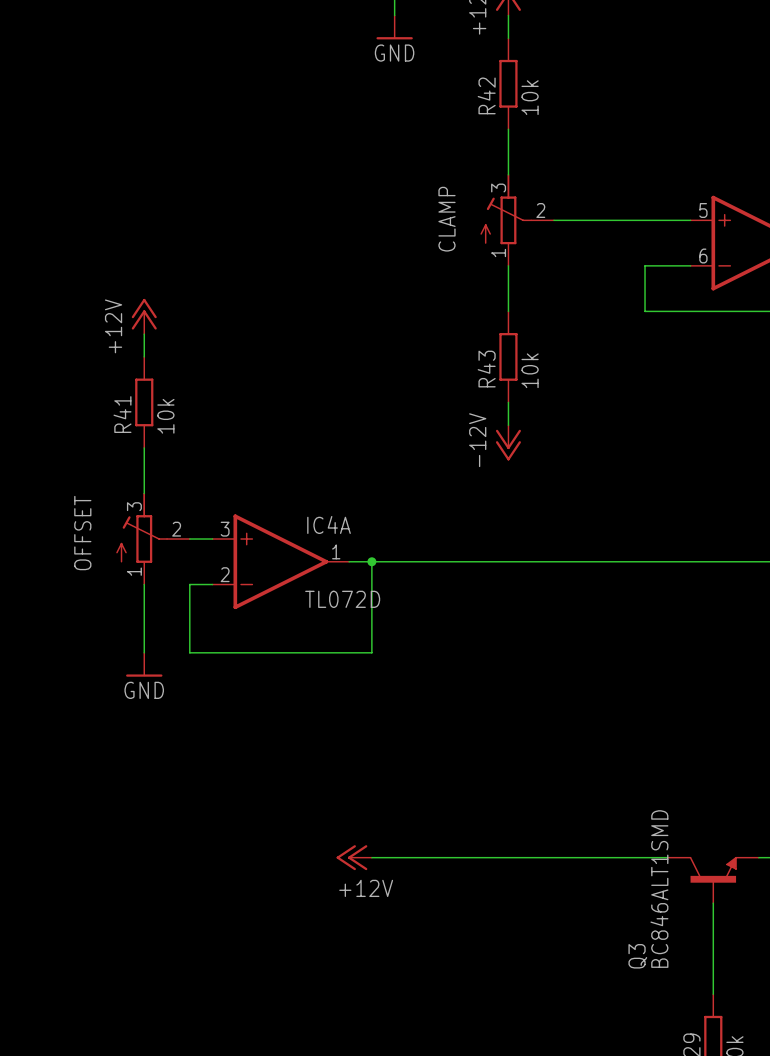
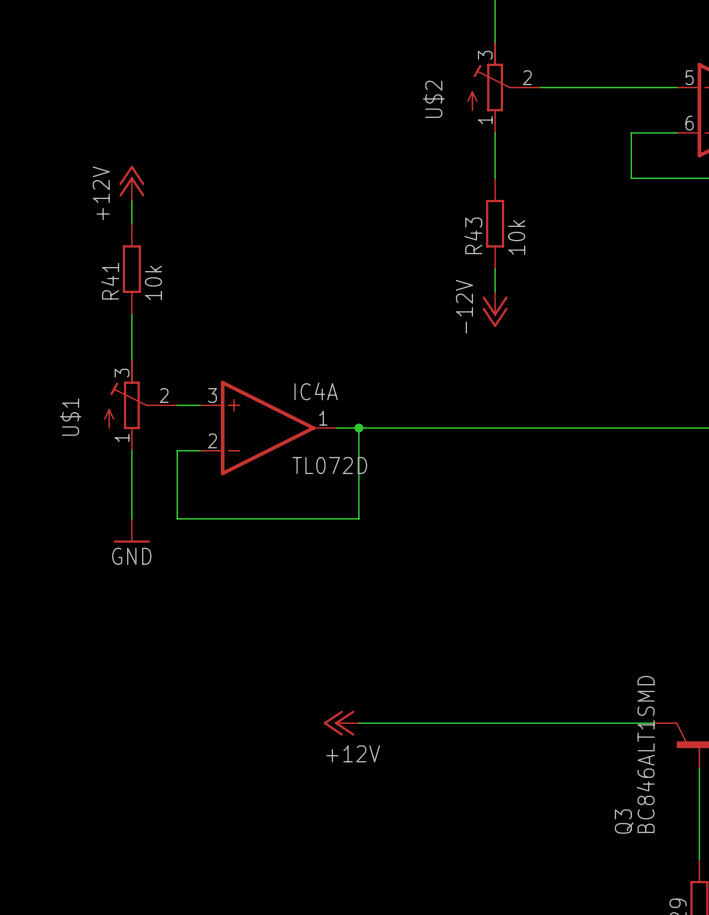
CLAMP name: CLAMP (446, 219) -> U$2 (433, 99)
OFFSET name: OFFSET (82, 533) -> U$1 (70, 417)

